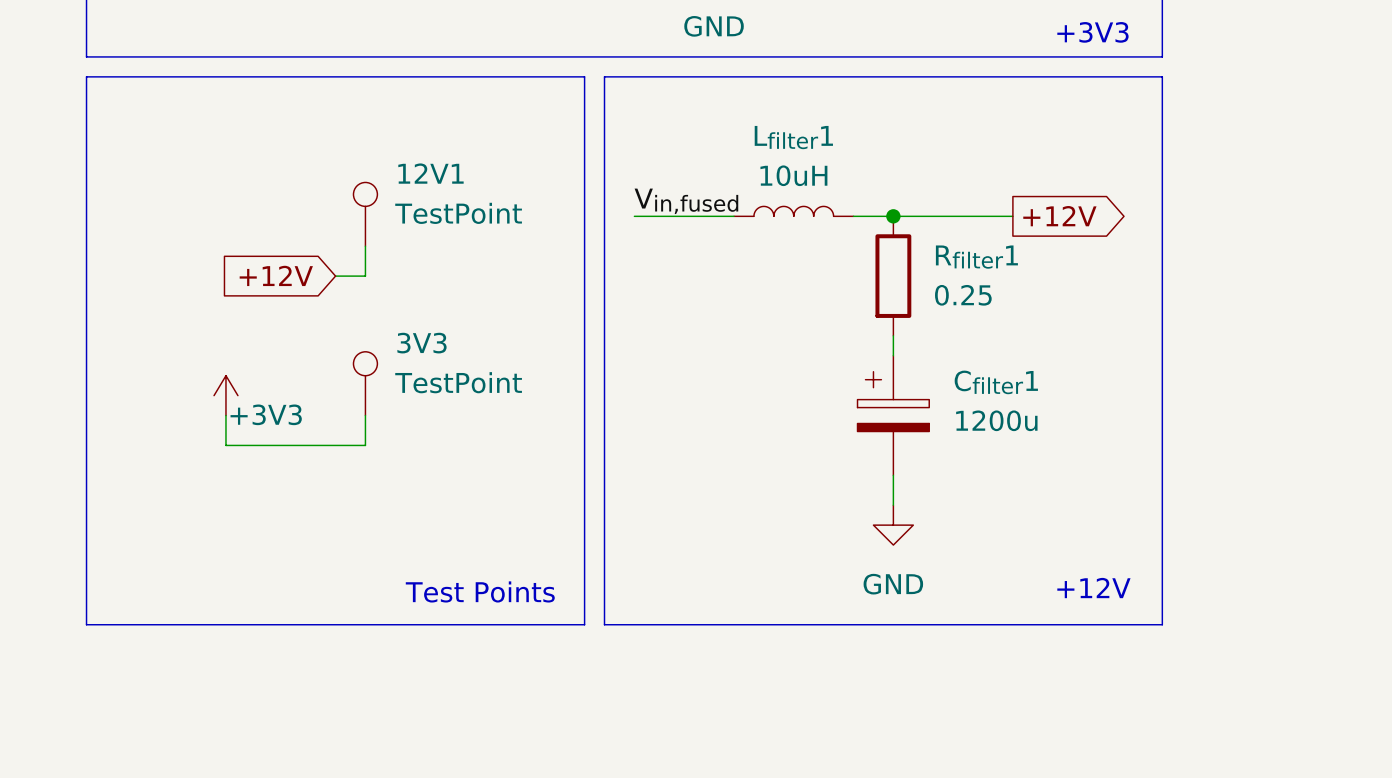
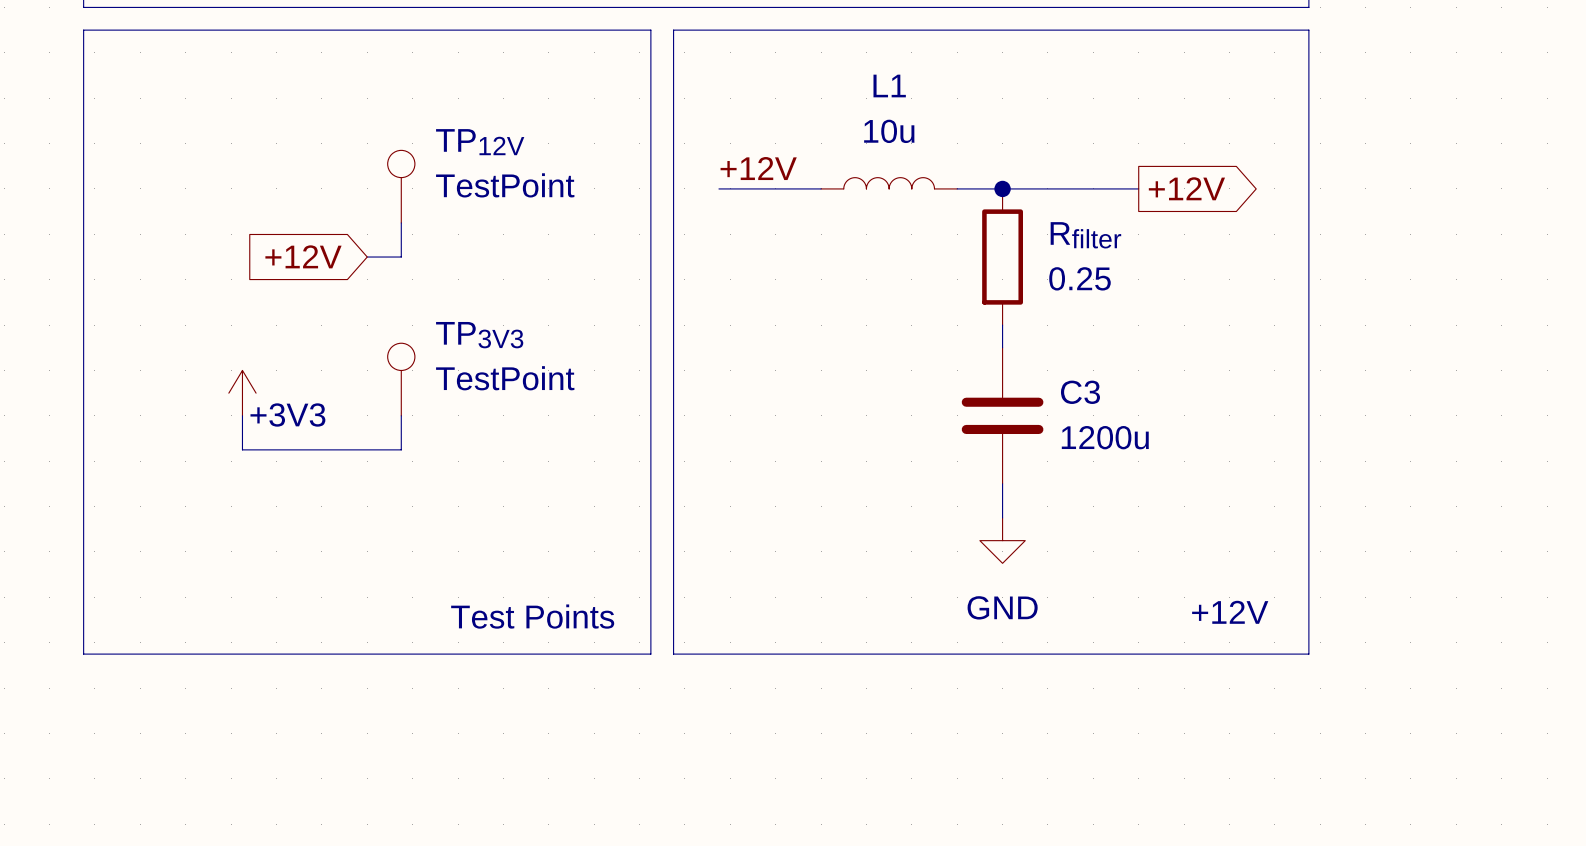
Lfilter1 name: Lfilter1 (793, 137) -> L1 (889, 85)
12V1 name: 12V1 (430, 173) -> TP12V (480, 142)
Lfilter1 value: 10uH (793, 175) -> 10u (889, 131)
label: Vin,fused (686, 201) -> +12V (758, 168)
wire: (634, 216) (644, 216) -> none
Rfilter1 name: Rfilter1 (976, 257) -> Rfilter (1085, 235)
3V3 name: 3V3 (422, 343) -> TP3V3 (479, 335)
Cfilter1: 1200u (893, 415) -> none
C3: none -> 1200u (1002, 415)

